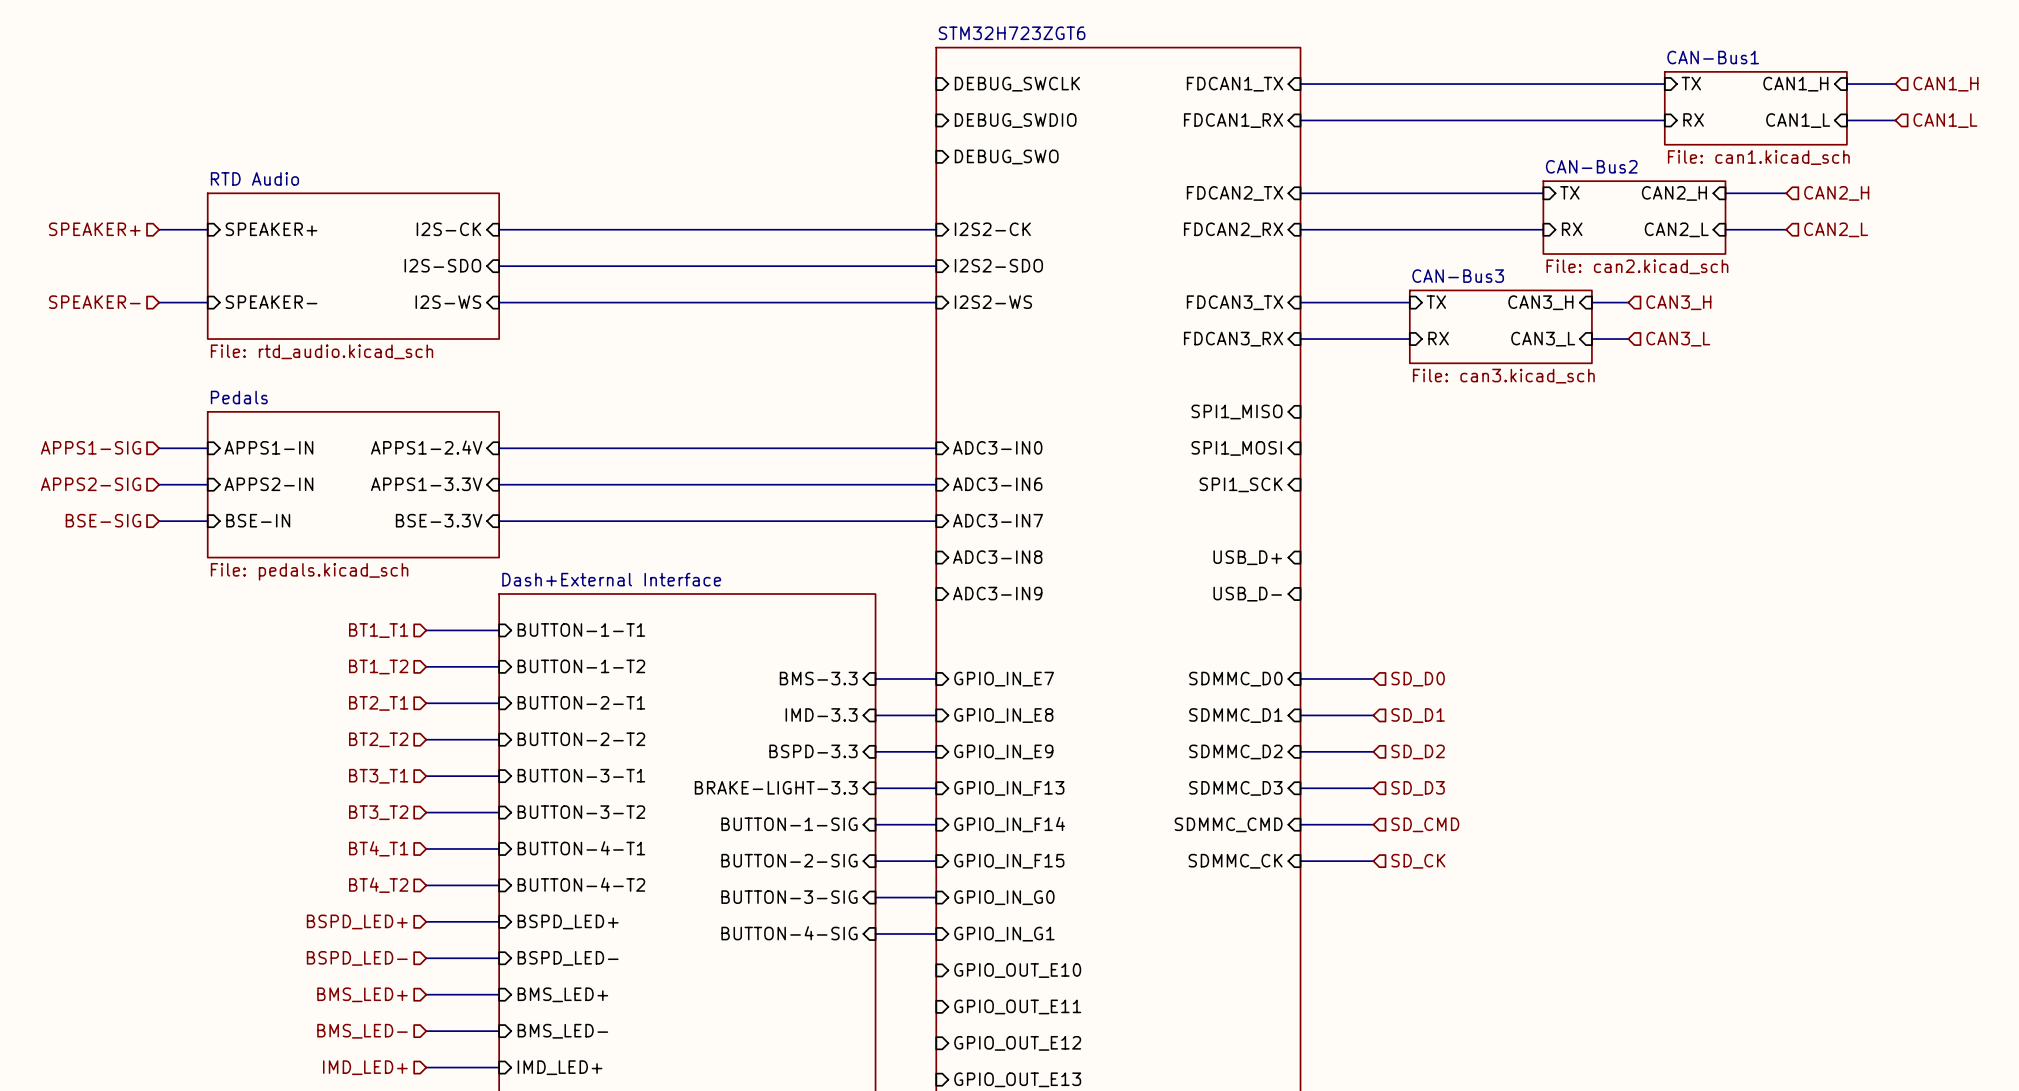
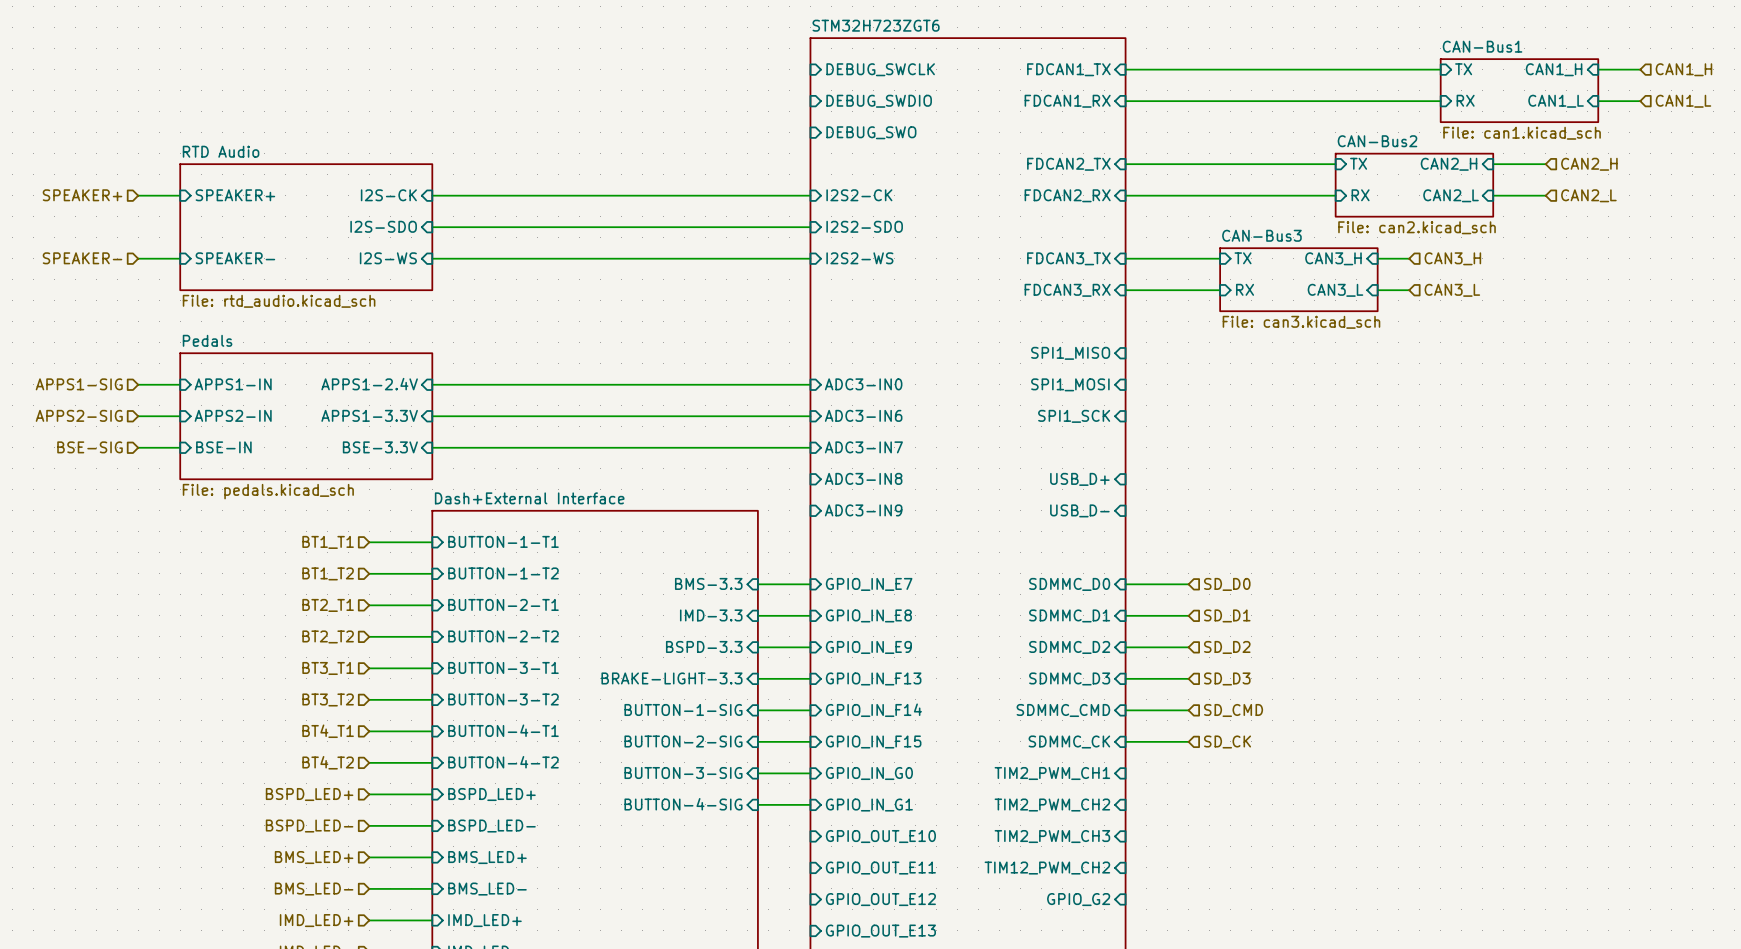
sheet pin: none -> TIM2_PWM_CH1 (1052, 773)
sheet pin: none -> TIM2_PWM_CH2 (1052, 805)
sheet pin: none -> TIM2_PWM_CH3 (1052, 836)
sheet pin: none -> TIM12_PWM_CH2 (1047, 868)
sheet pin: none -> GPIO_G2 (1078, 899)

